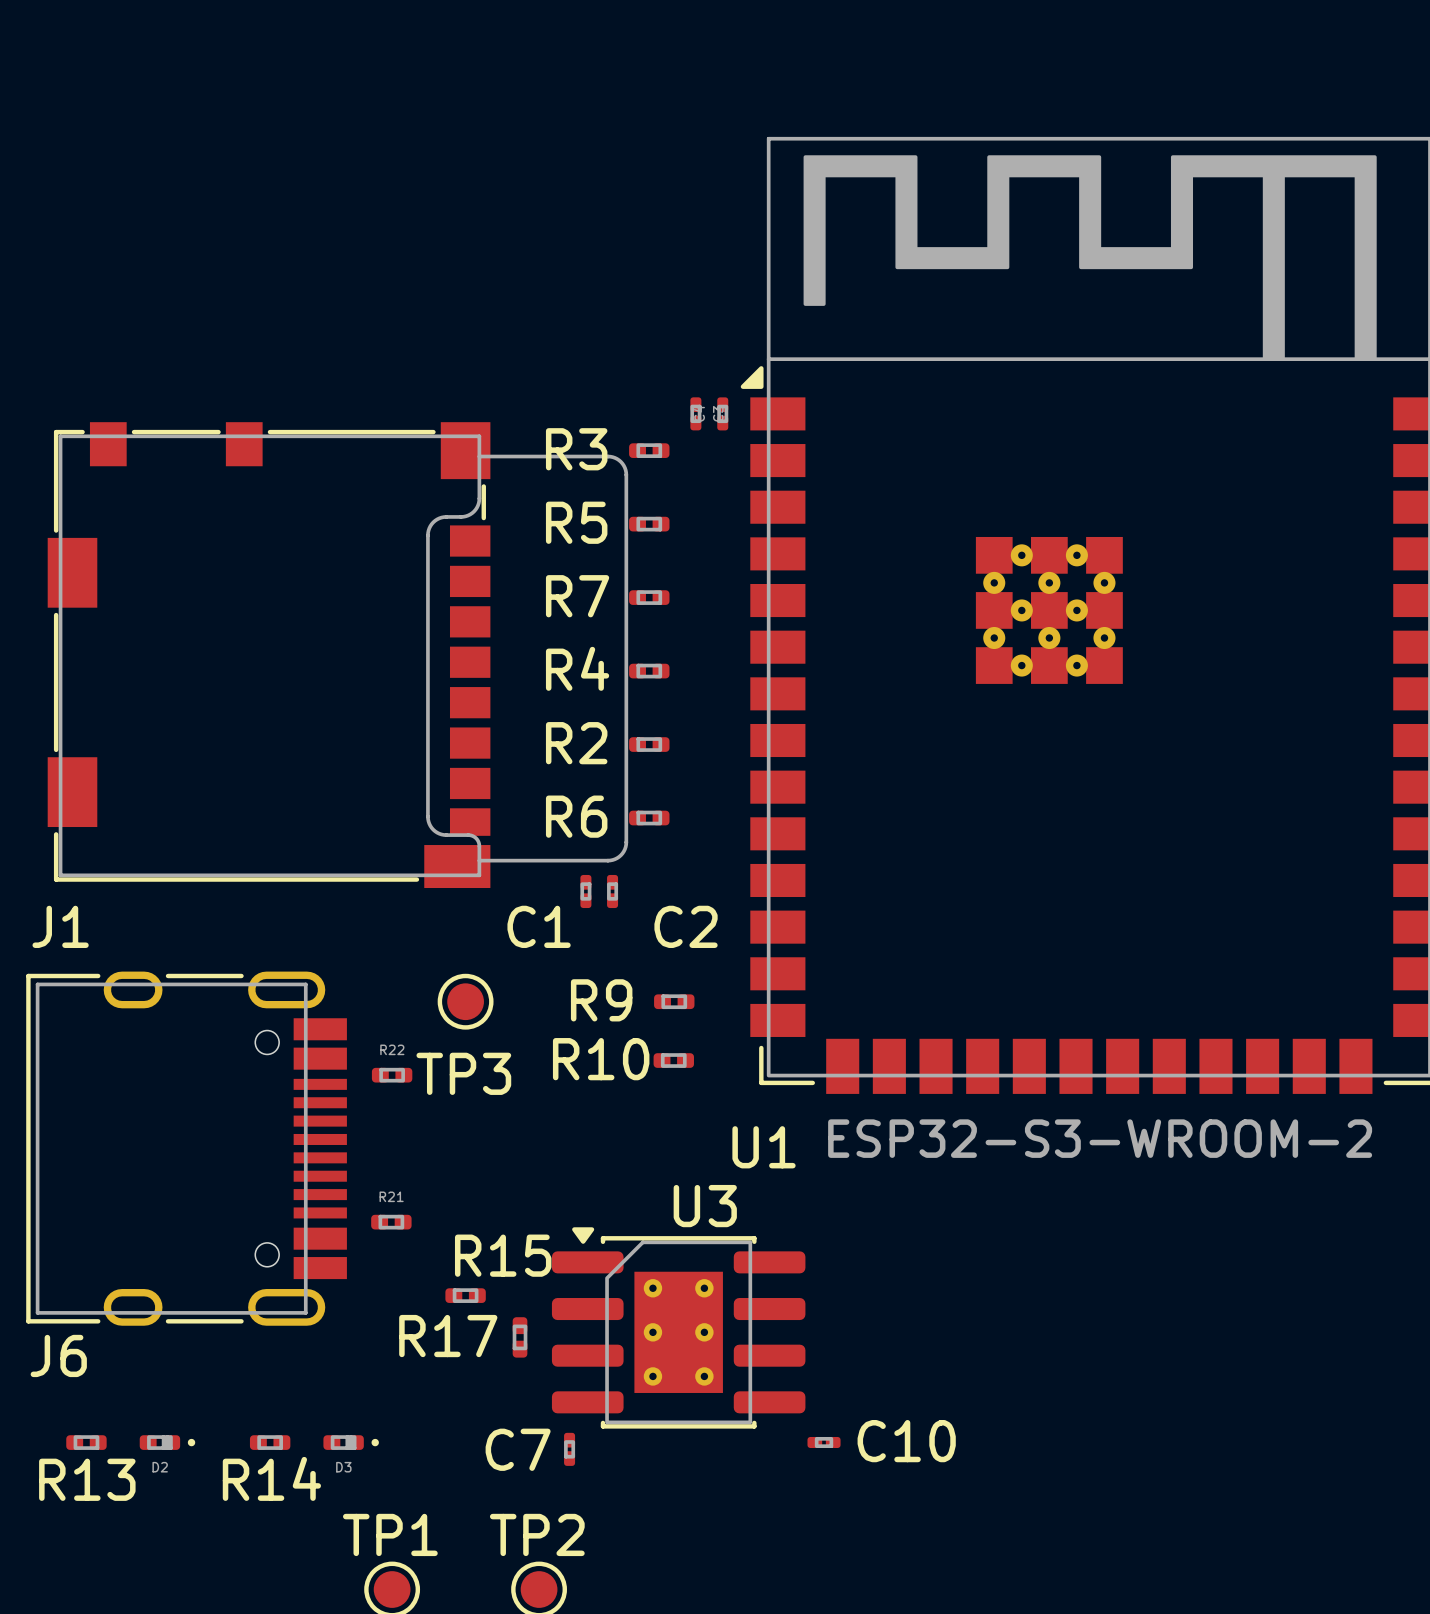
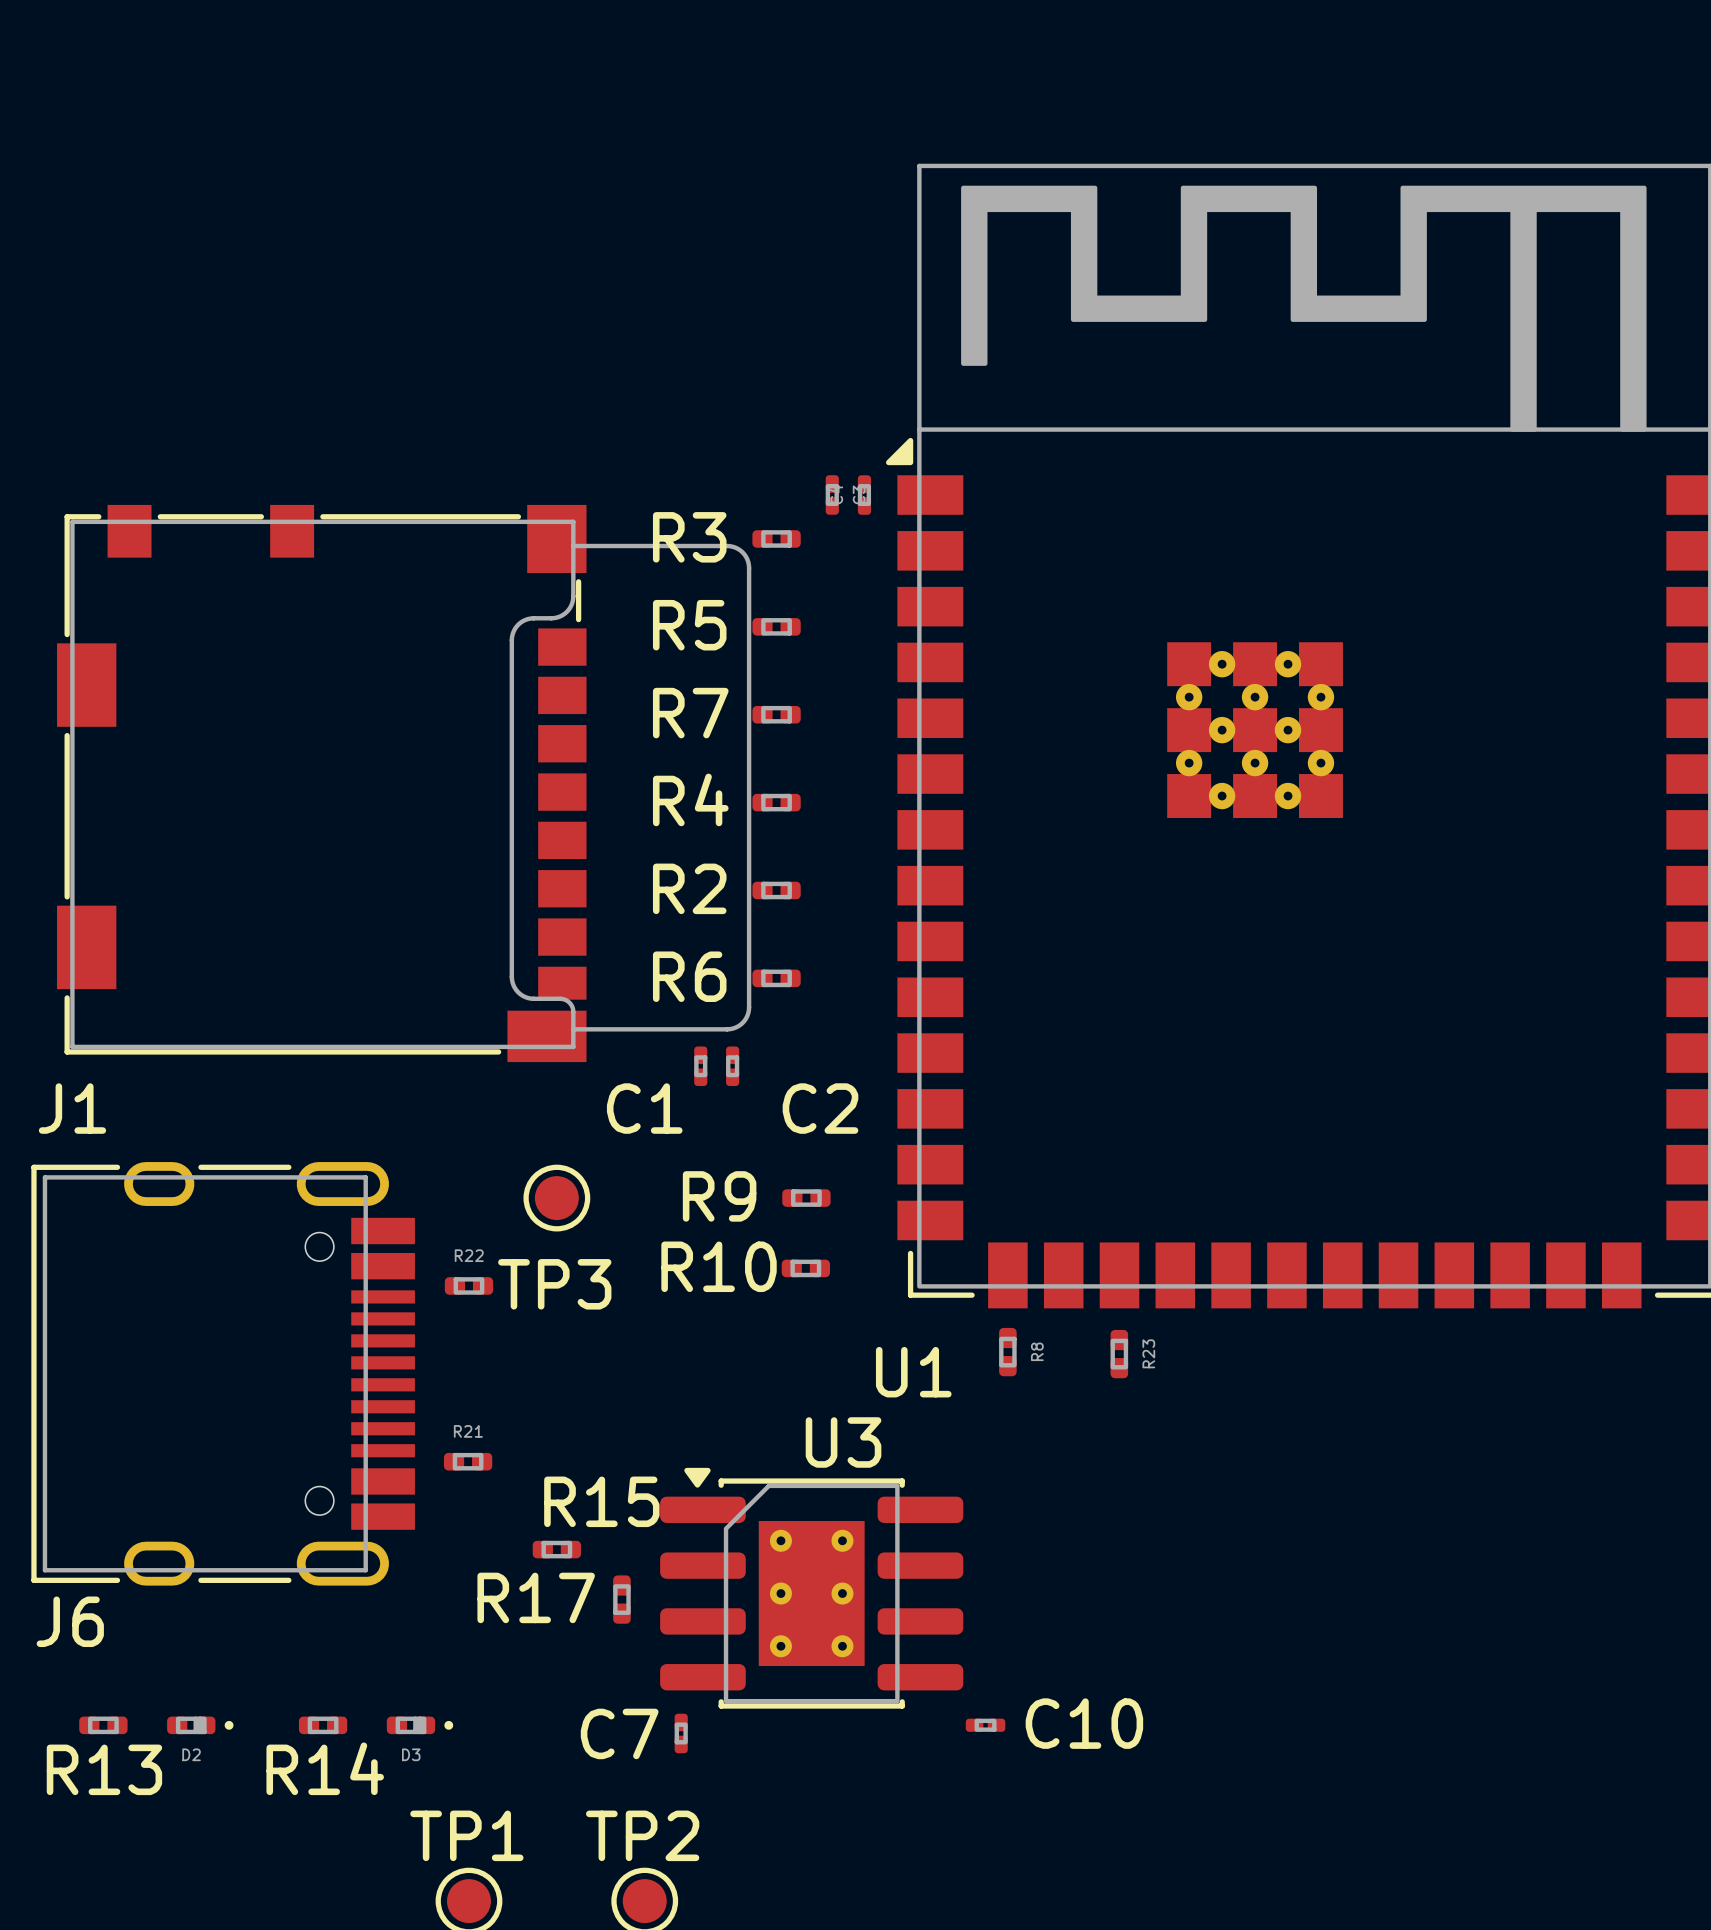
R8: none -> (1007, 1352)
R23: none -> (1119, 1354)
U1 value: ESP32-S3-WROOM-2 (1100, 1138) -> none

